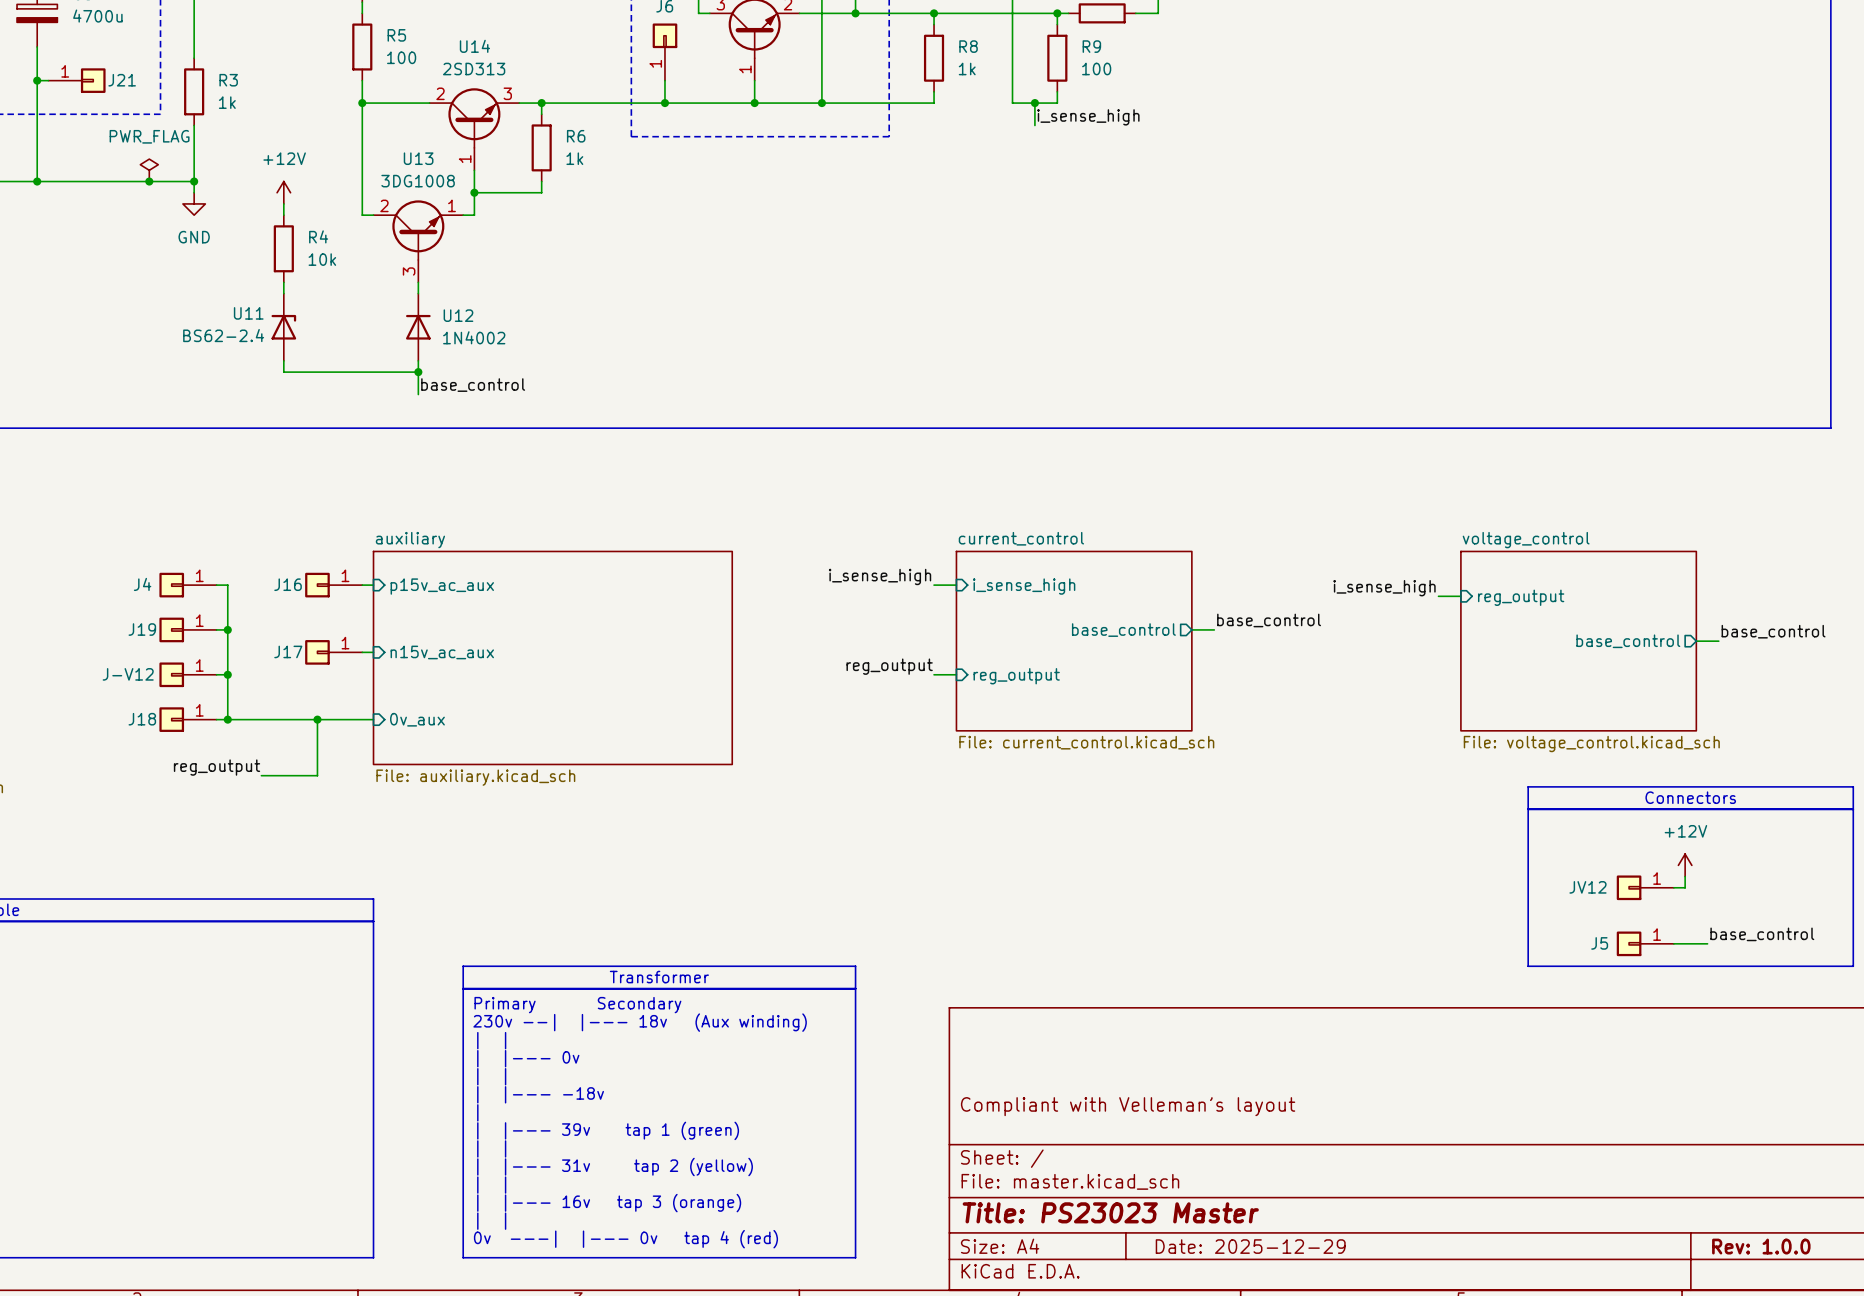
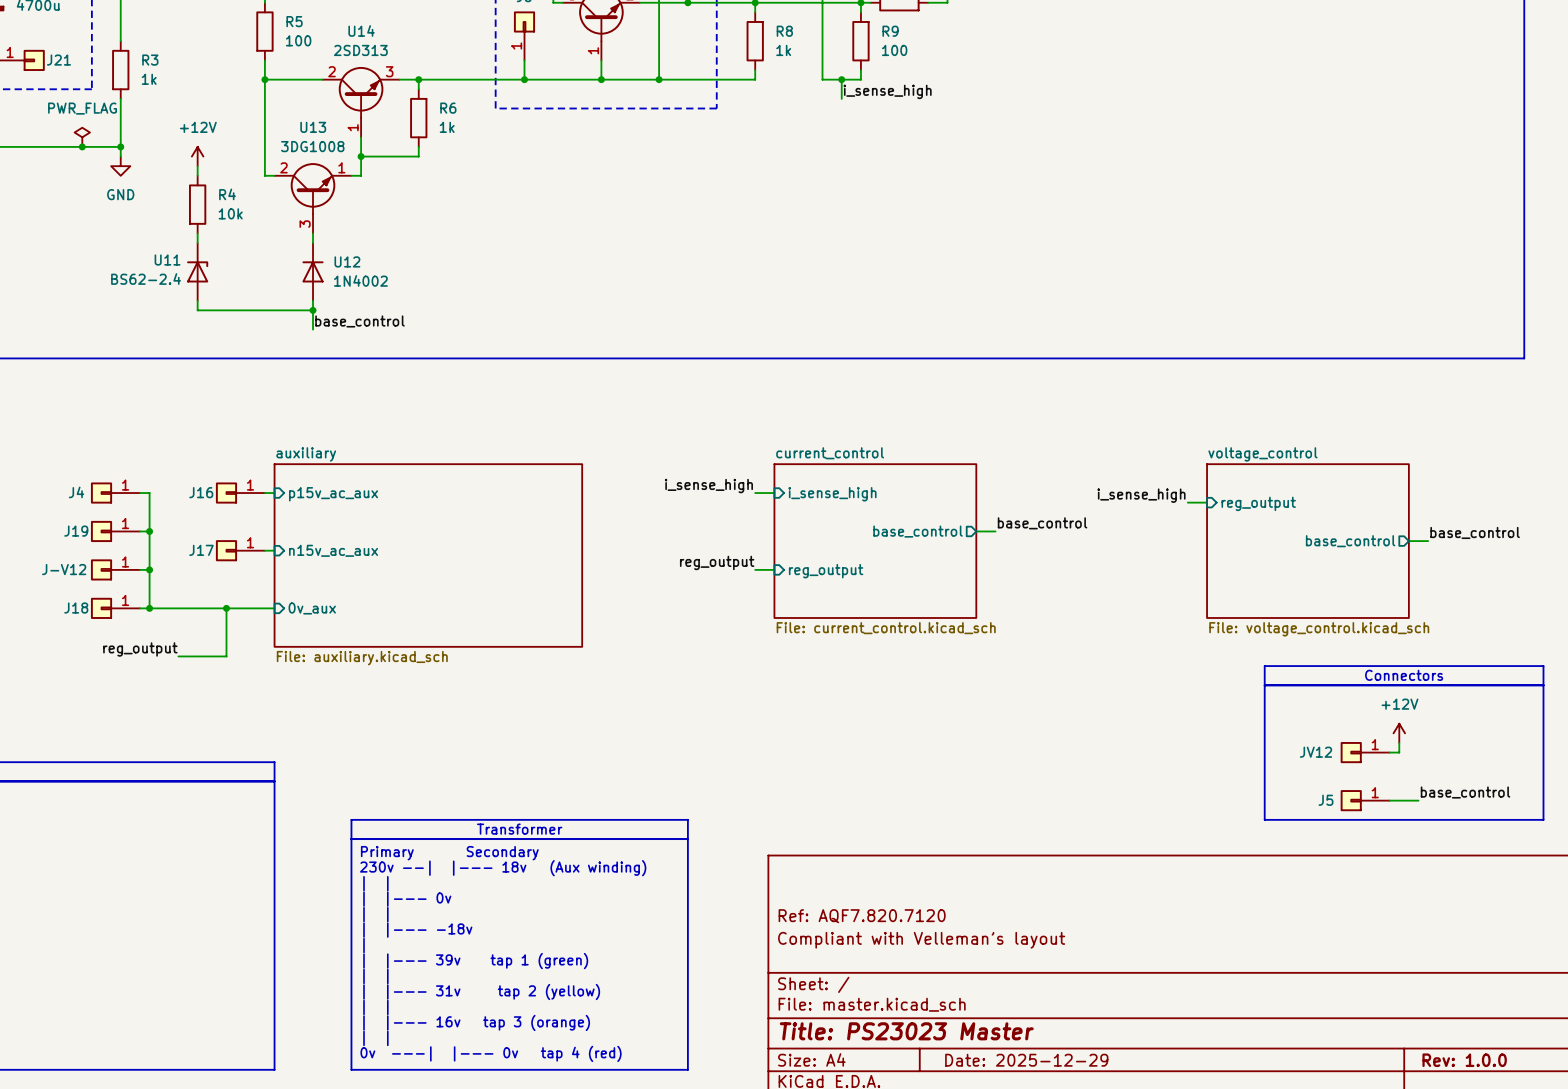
title block: none -> Ref: AQF7.820.7120 (862, 916)

